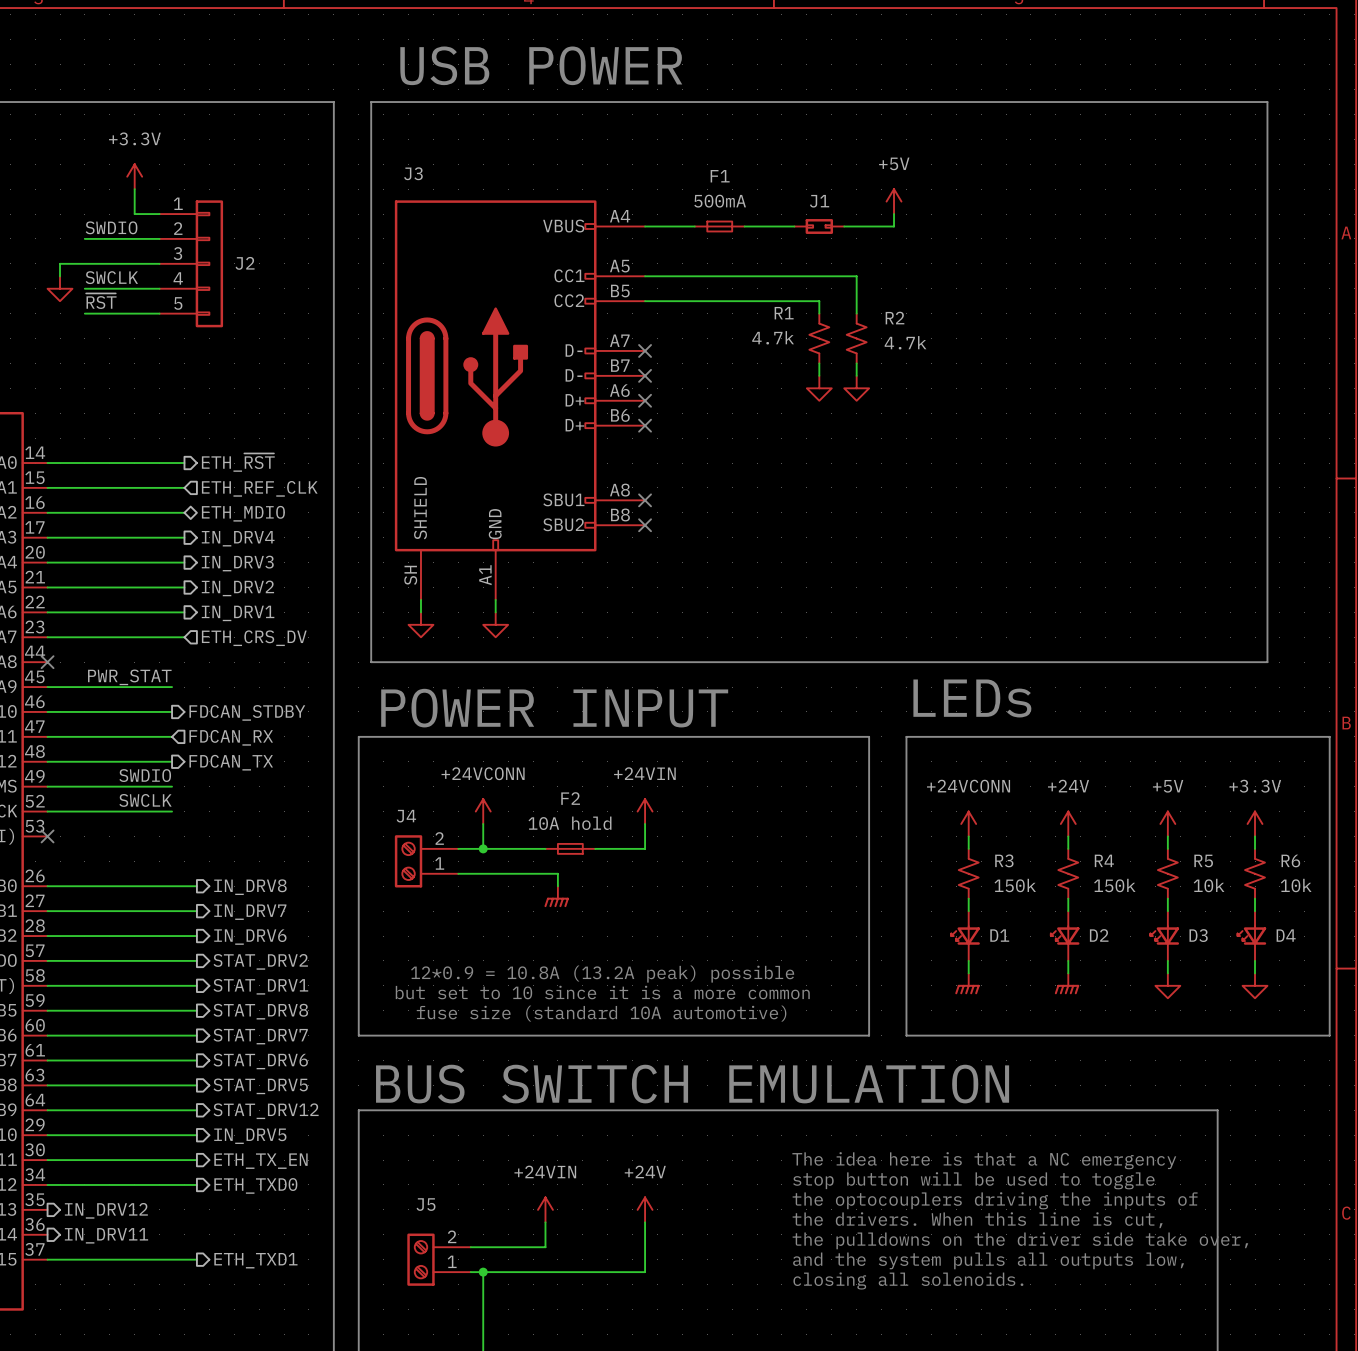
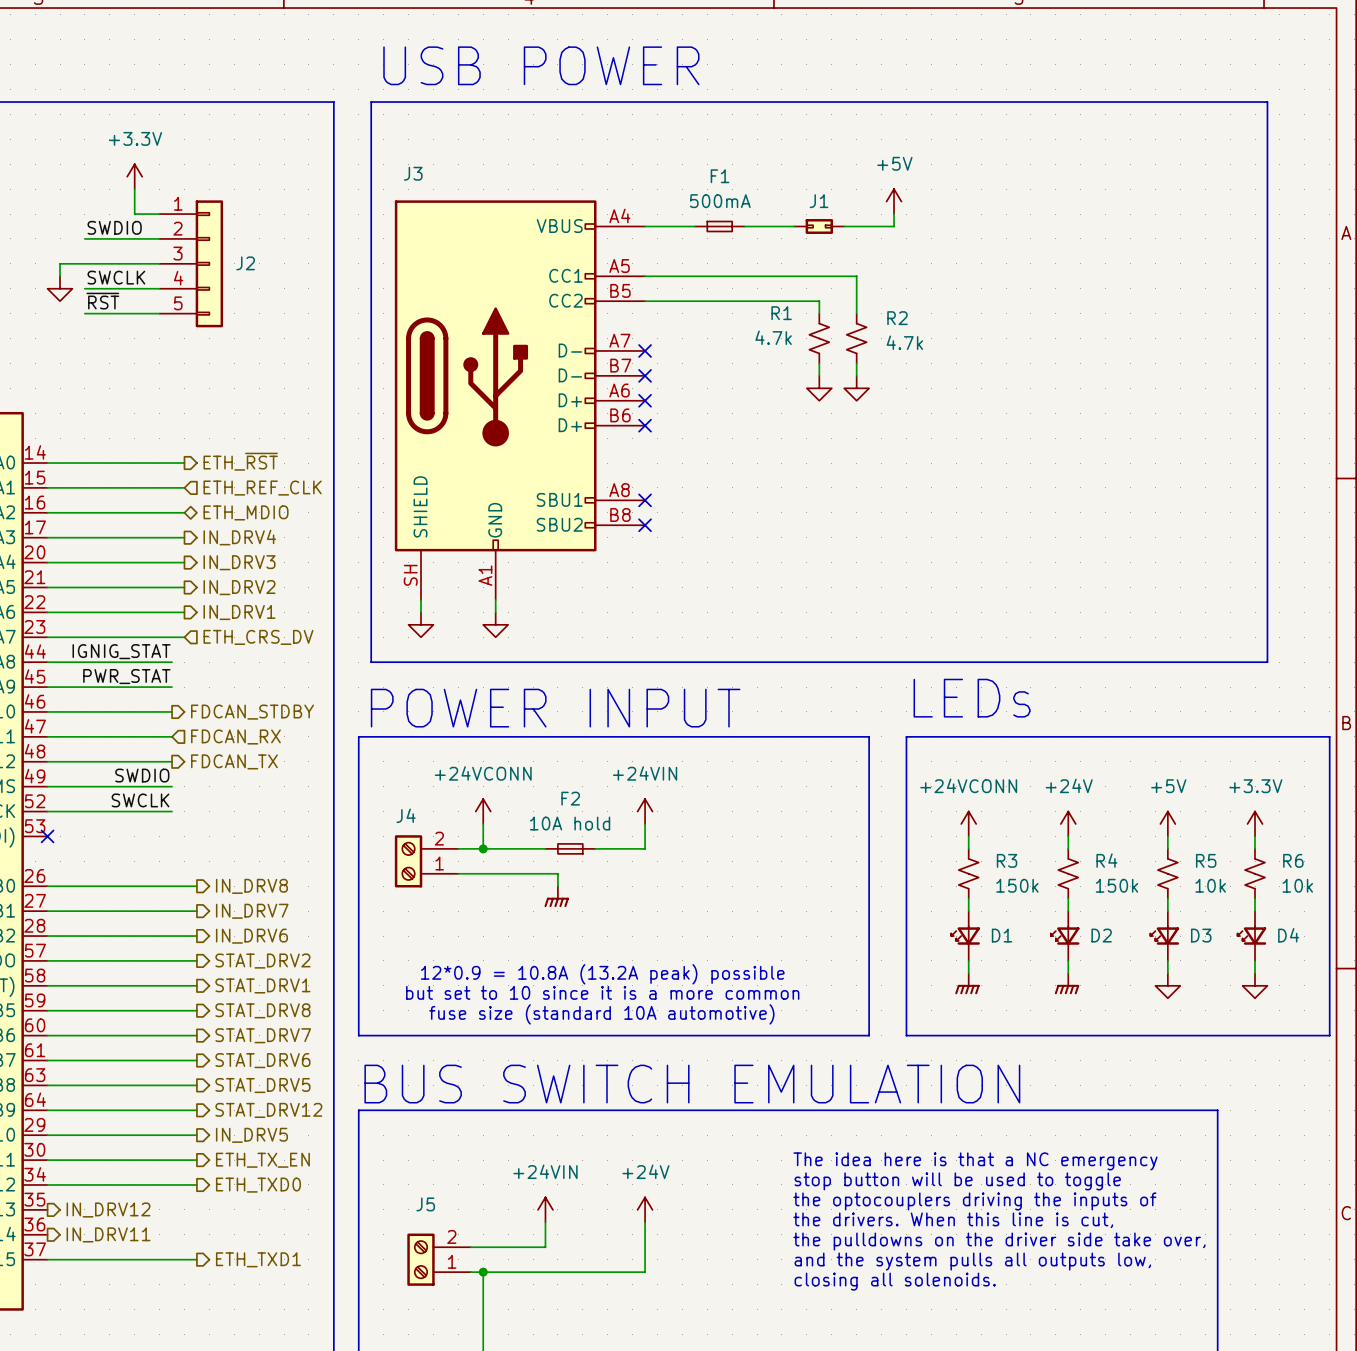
label: none -> IGNIG_STAT (121, 651)
wire: none -> (47, 662) (172, 662)
no-connect mark: (47, 662) -> none

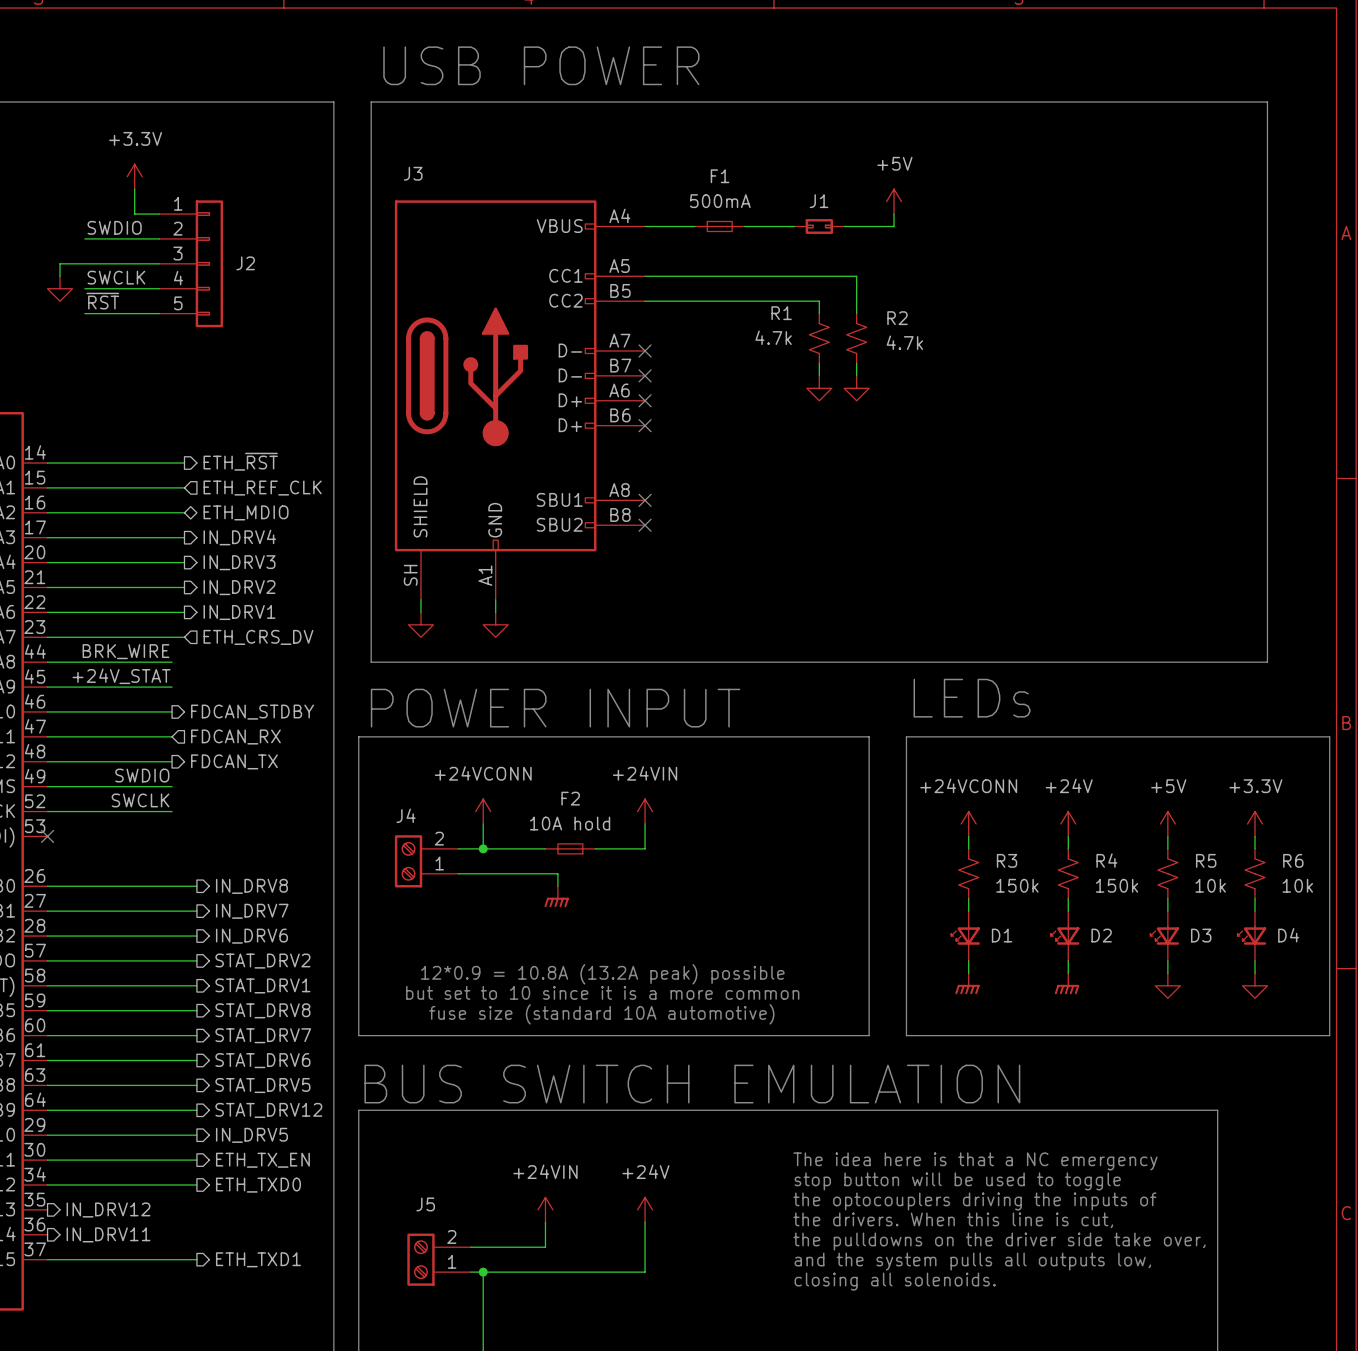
label: IGNIG_STAT (121, 651) -> BRK_WIRE (126, 651)
label: PWR_STAT (126, 676) -> +24V_STAT (121, 676)

